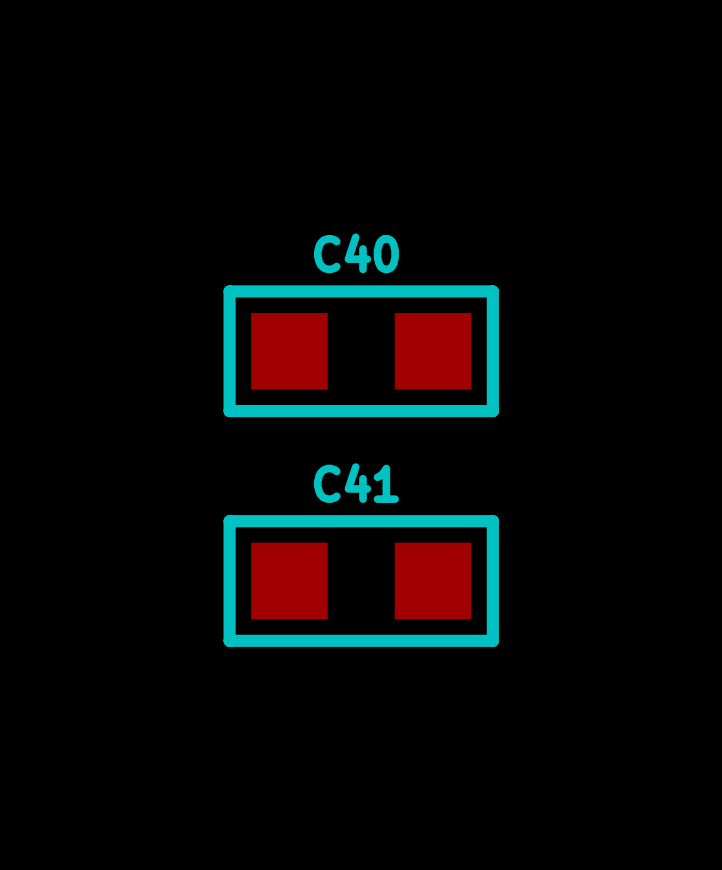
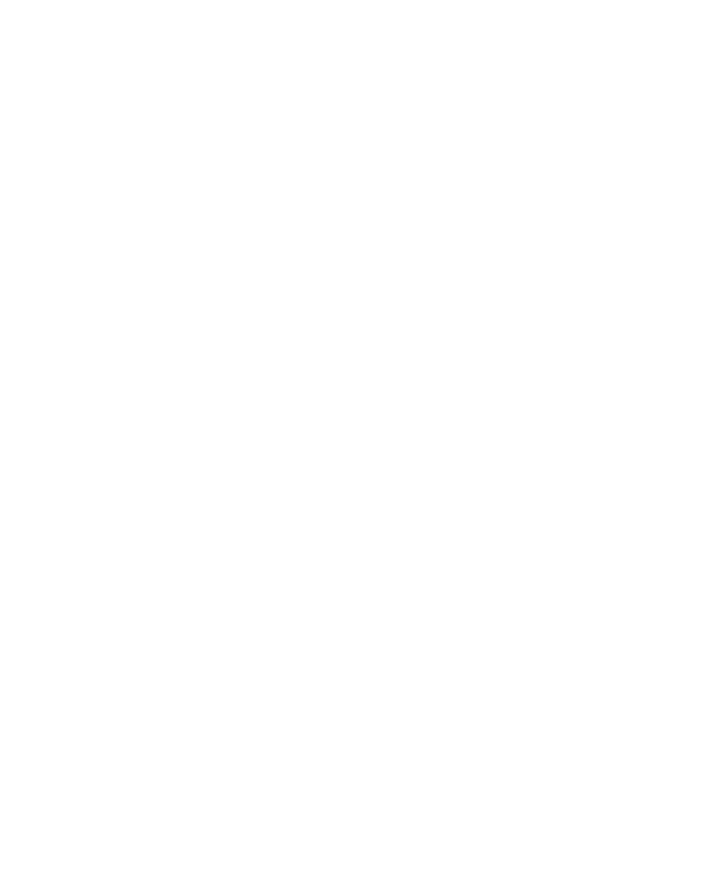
C40: (361, 351) -> none
C41: (361, 581) -> none

